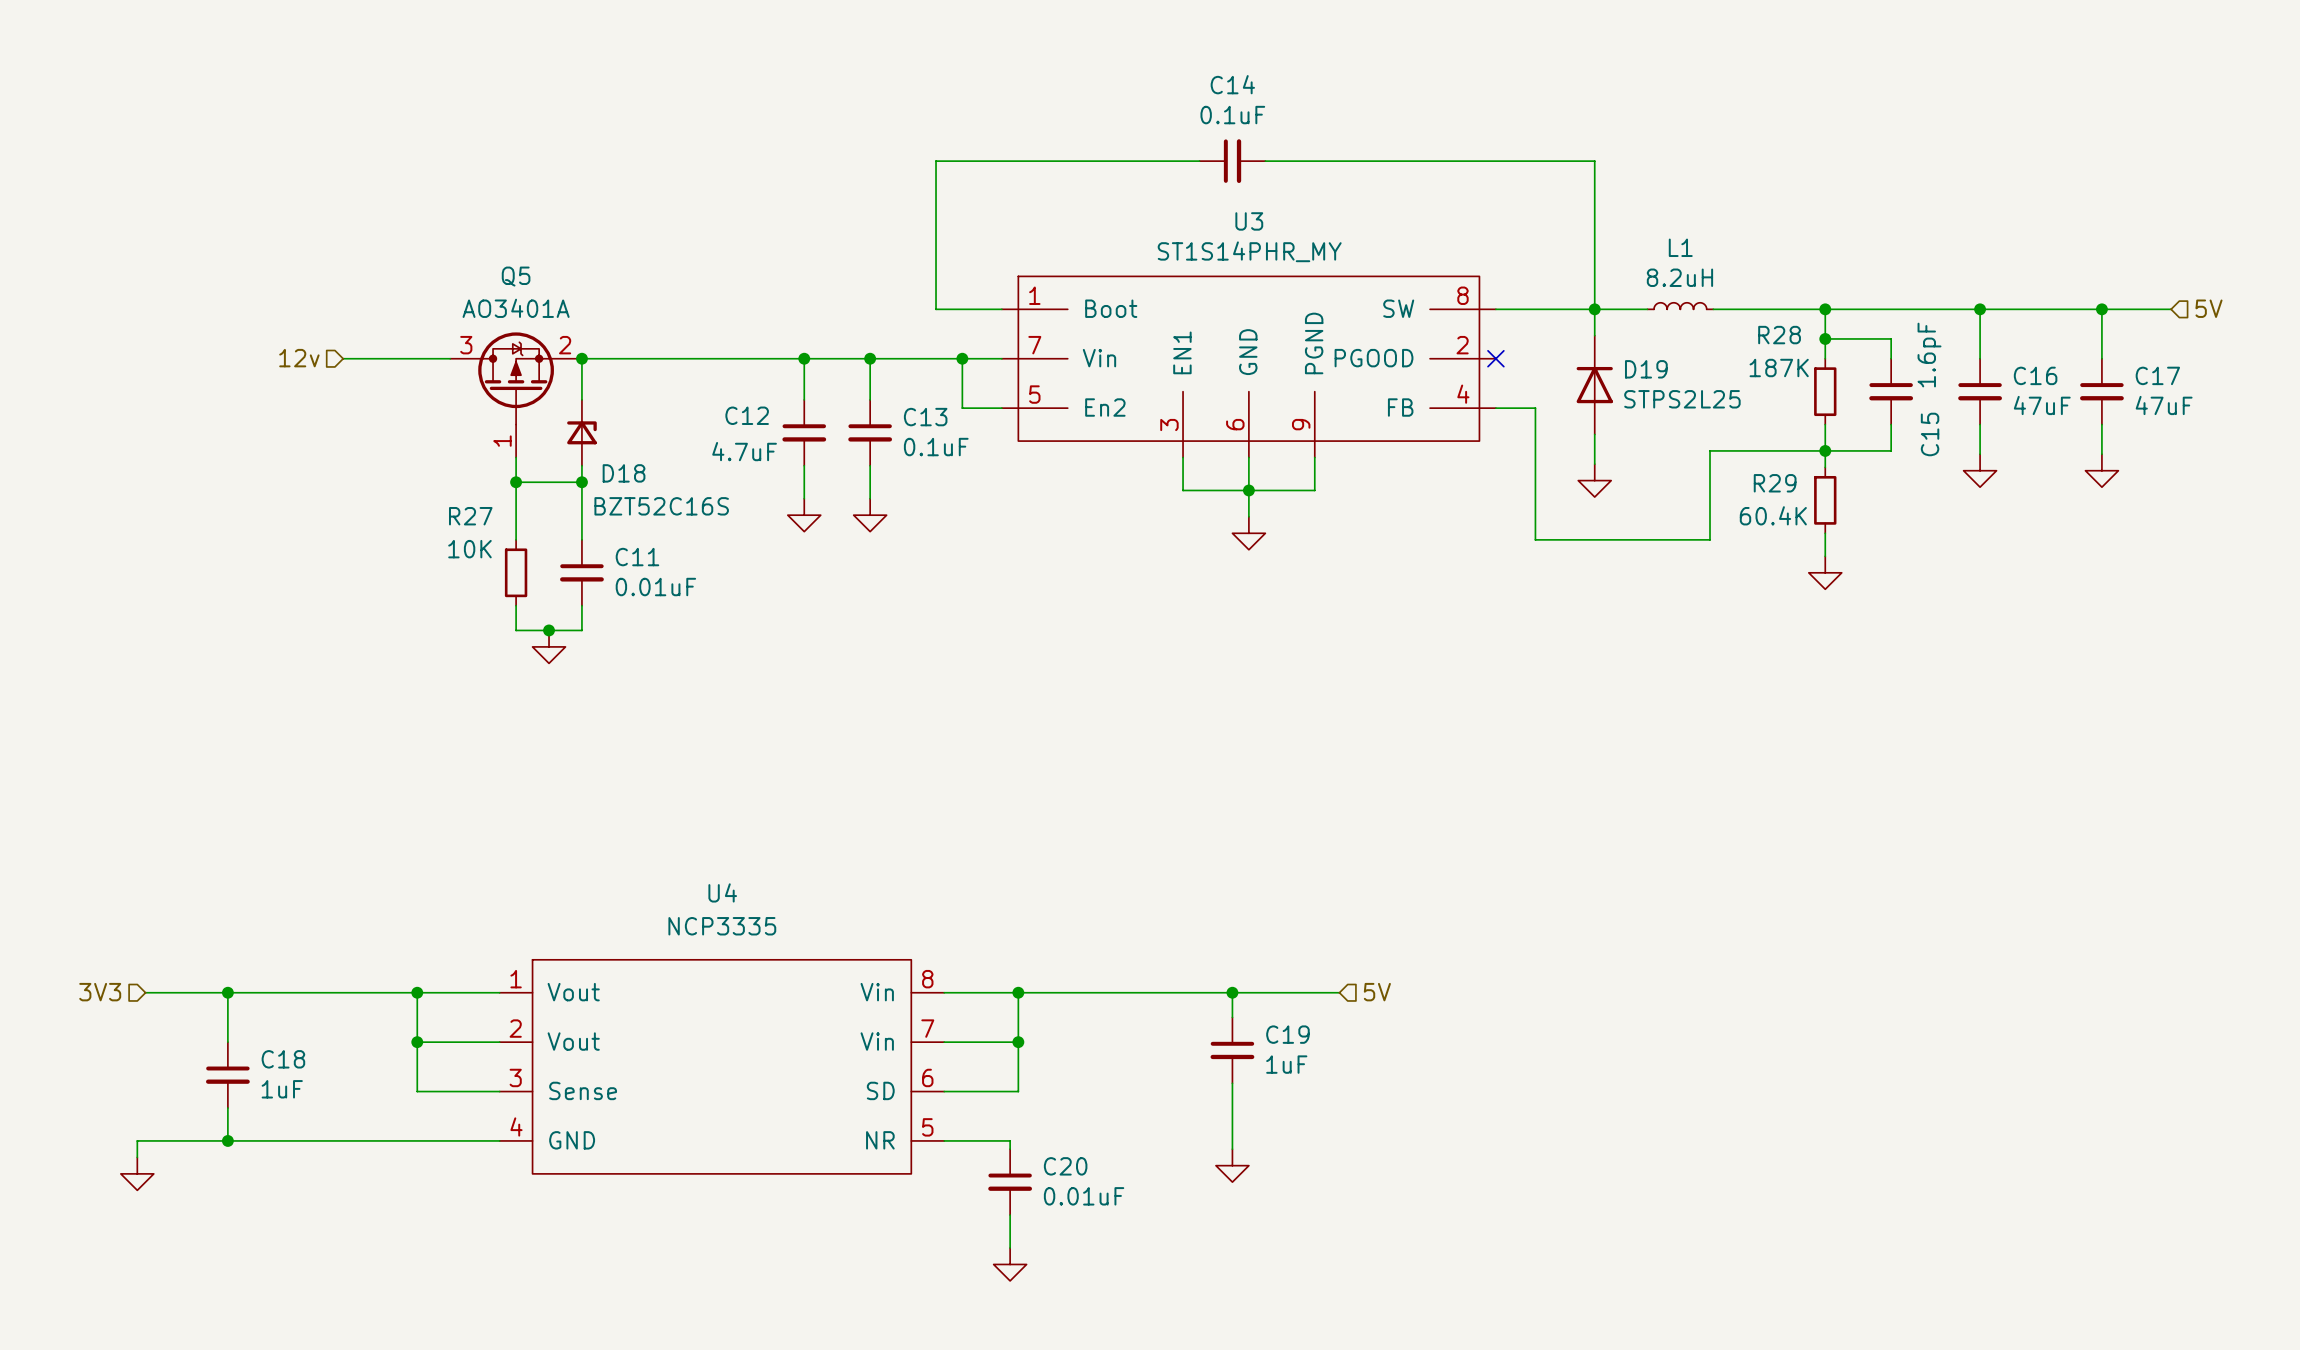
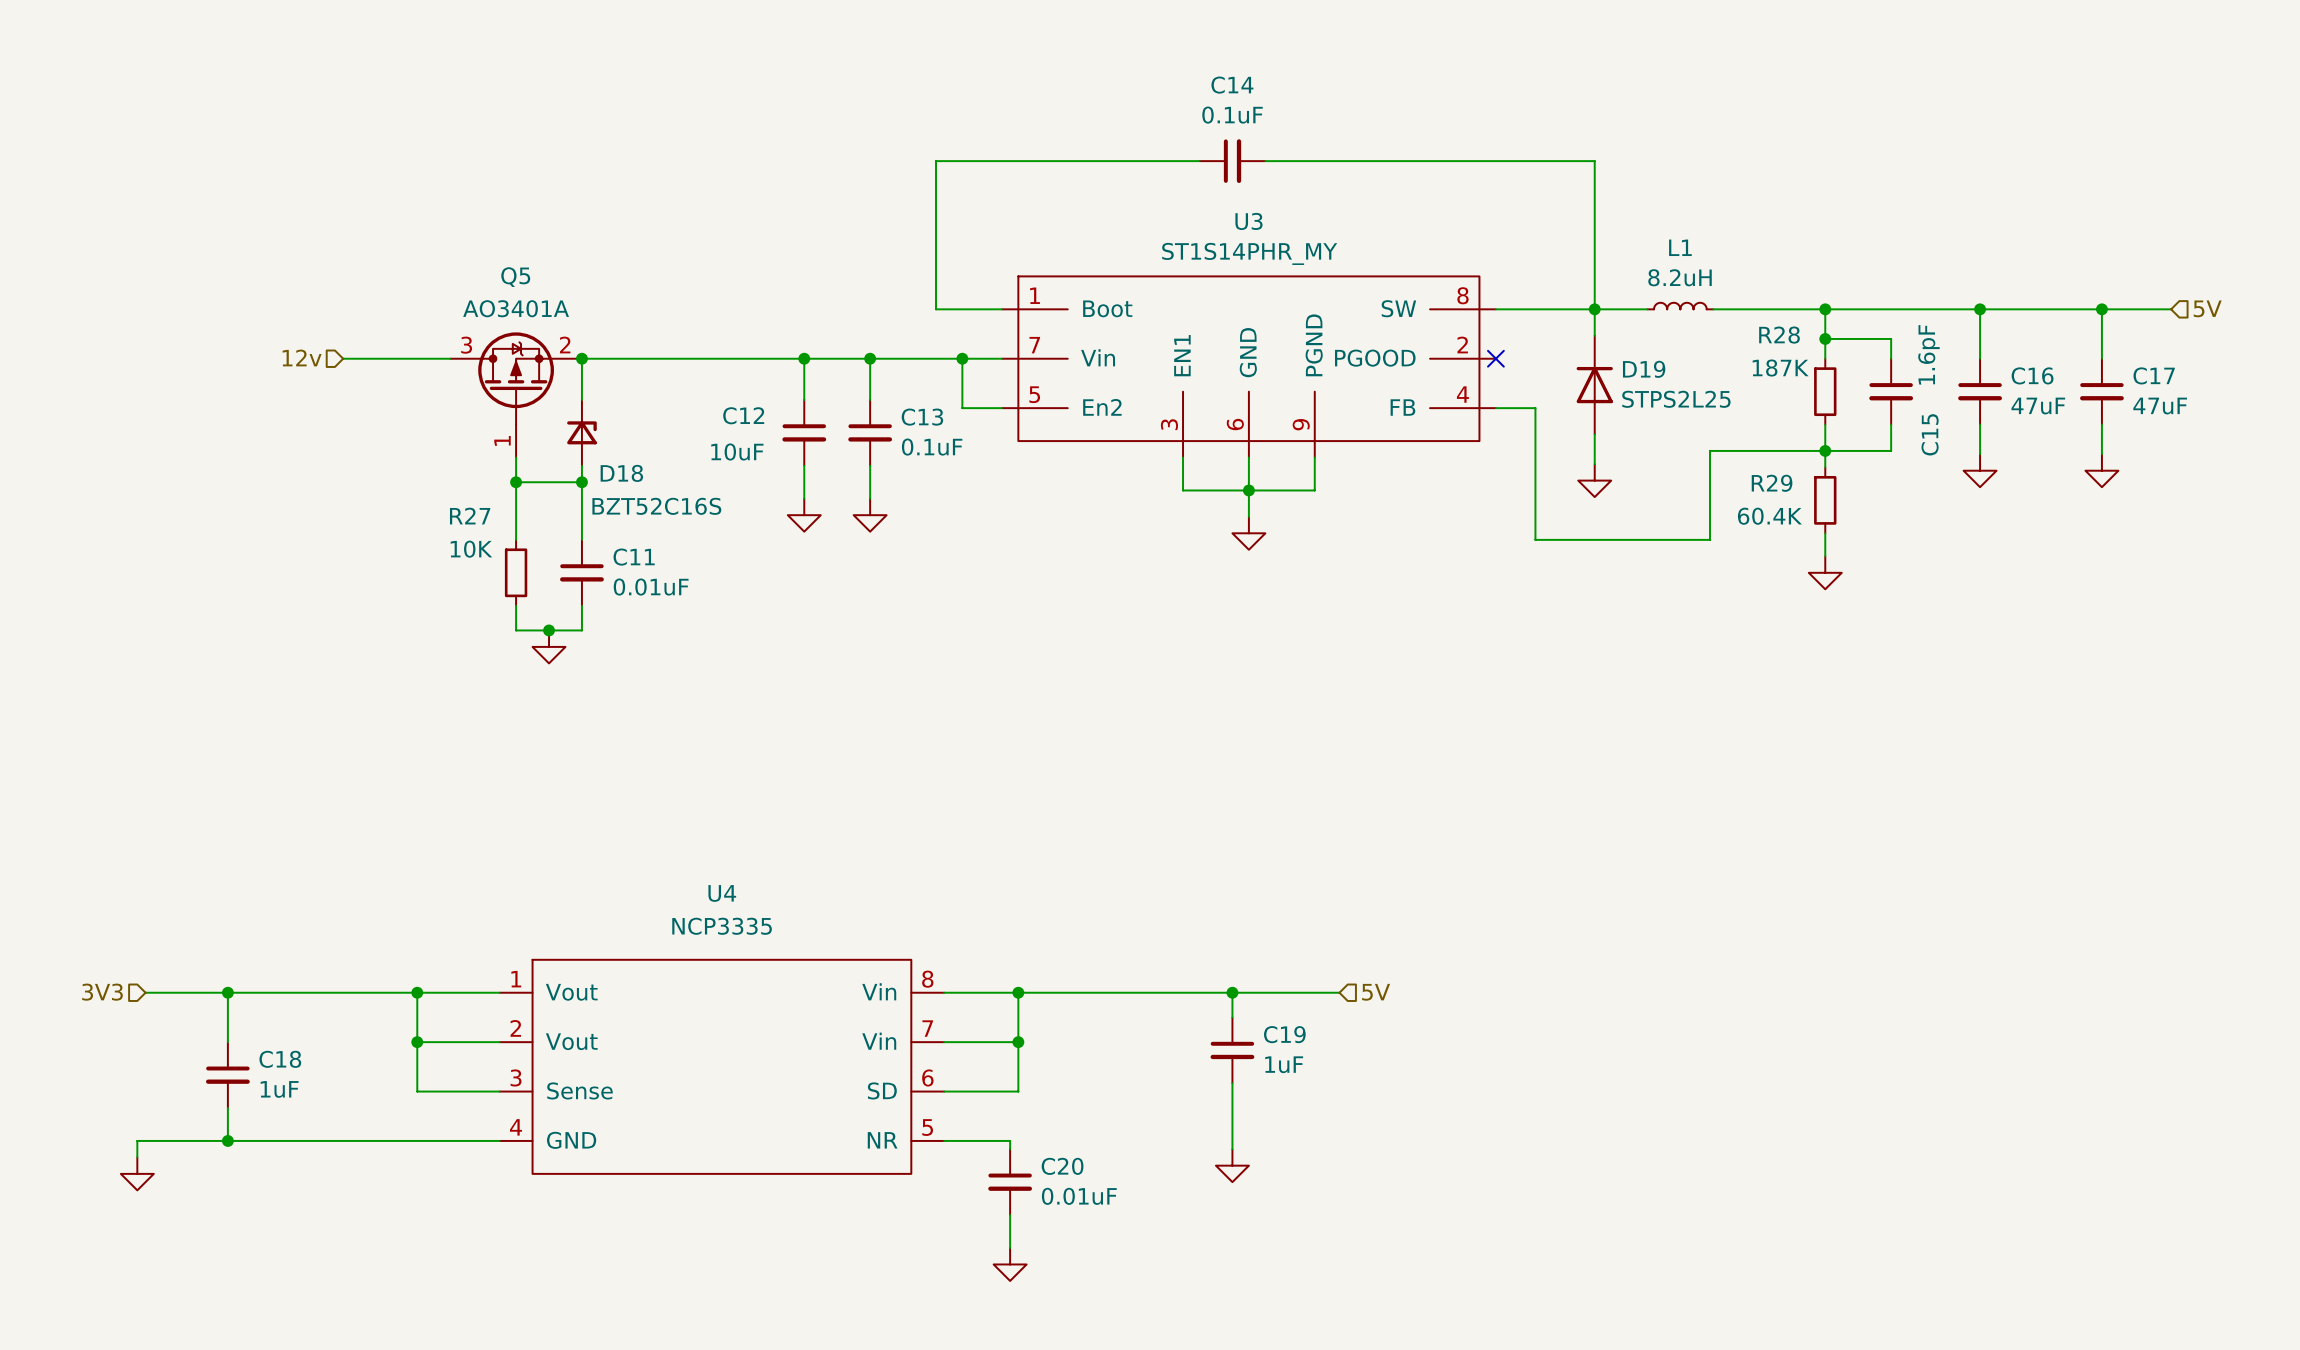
C12 value: 4.7uF (744, 451) -> 10uF (737, 452)

